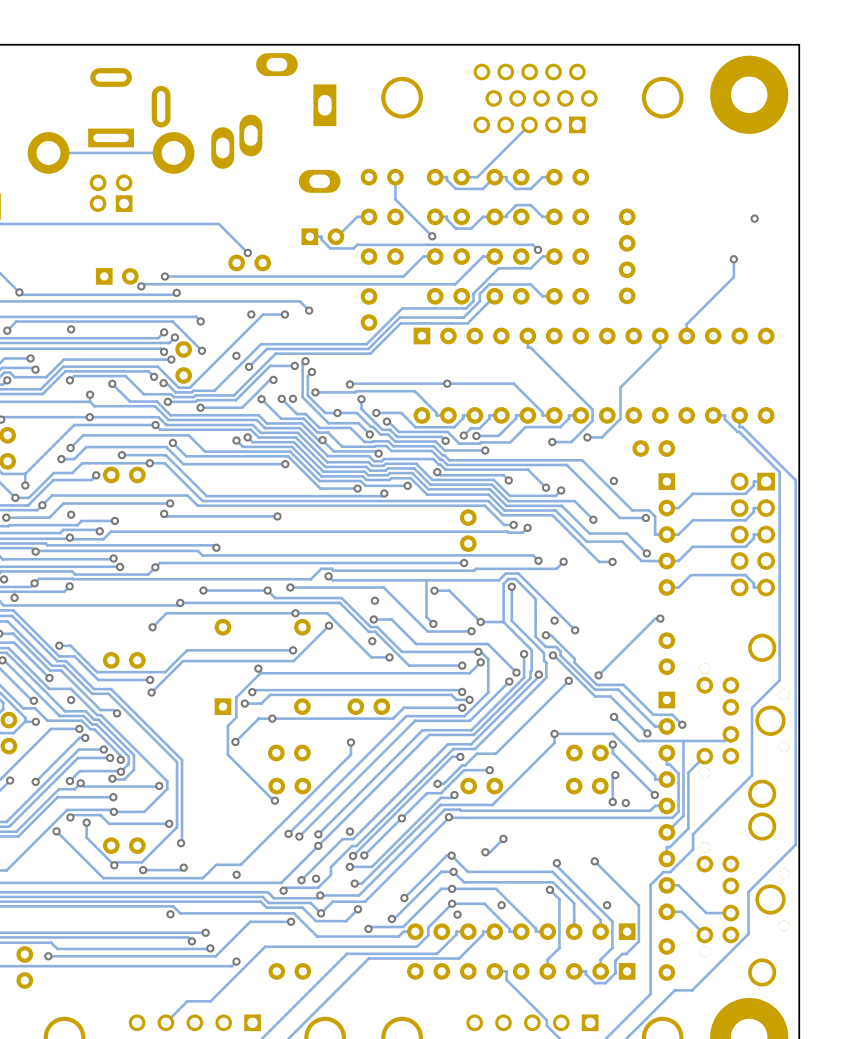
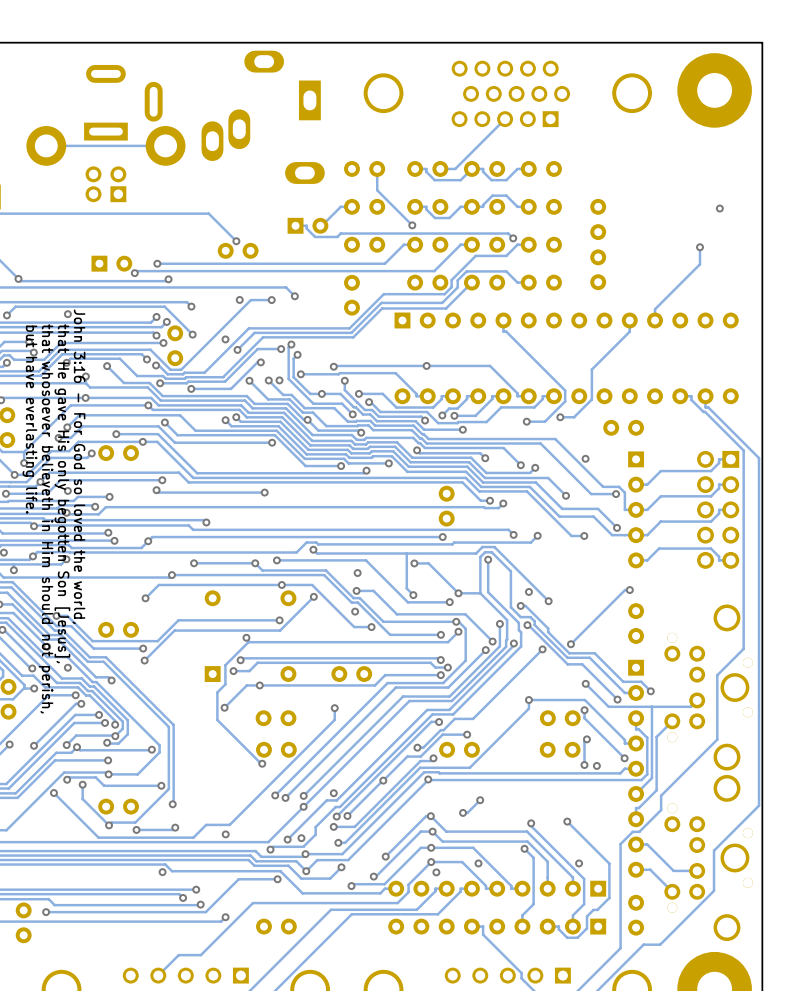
text: none -> but have everlasting life. (29, 419)
text: none -> John 3:16 - For God so loved the world, (78, 466)
text: none -> that He gave His only begotten Son [Jesus], (62, 493)
text: none -> that whosoever believeth in Him should not perish, (45, 518)

